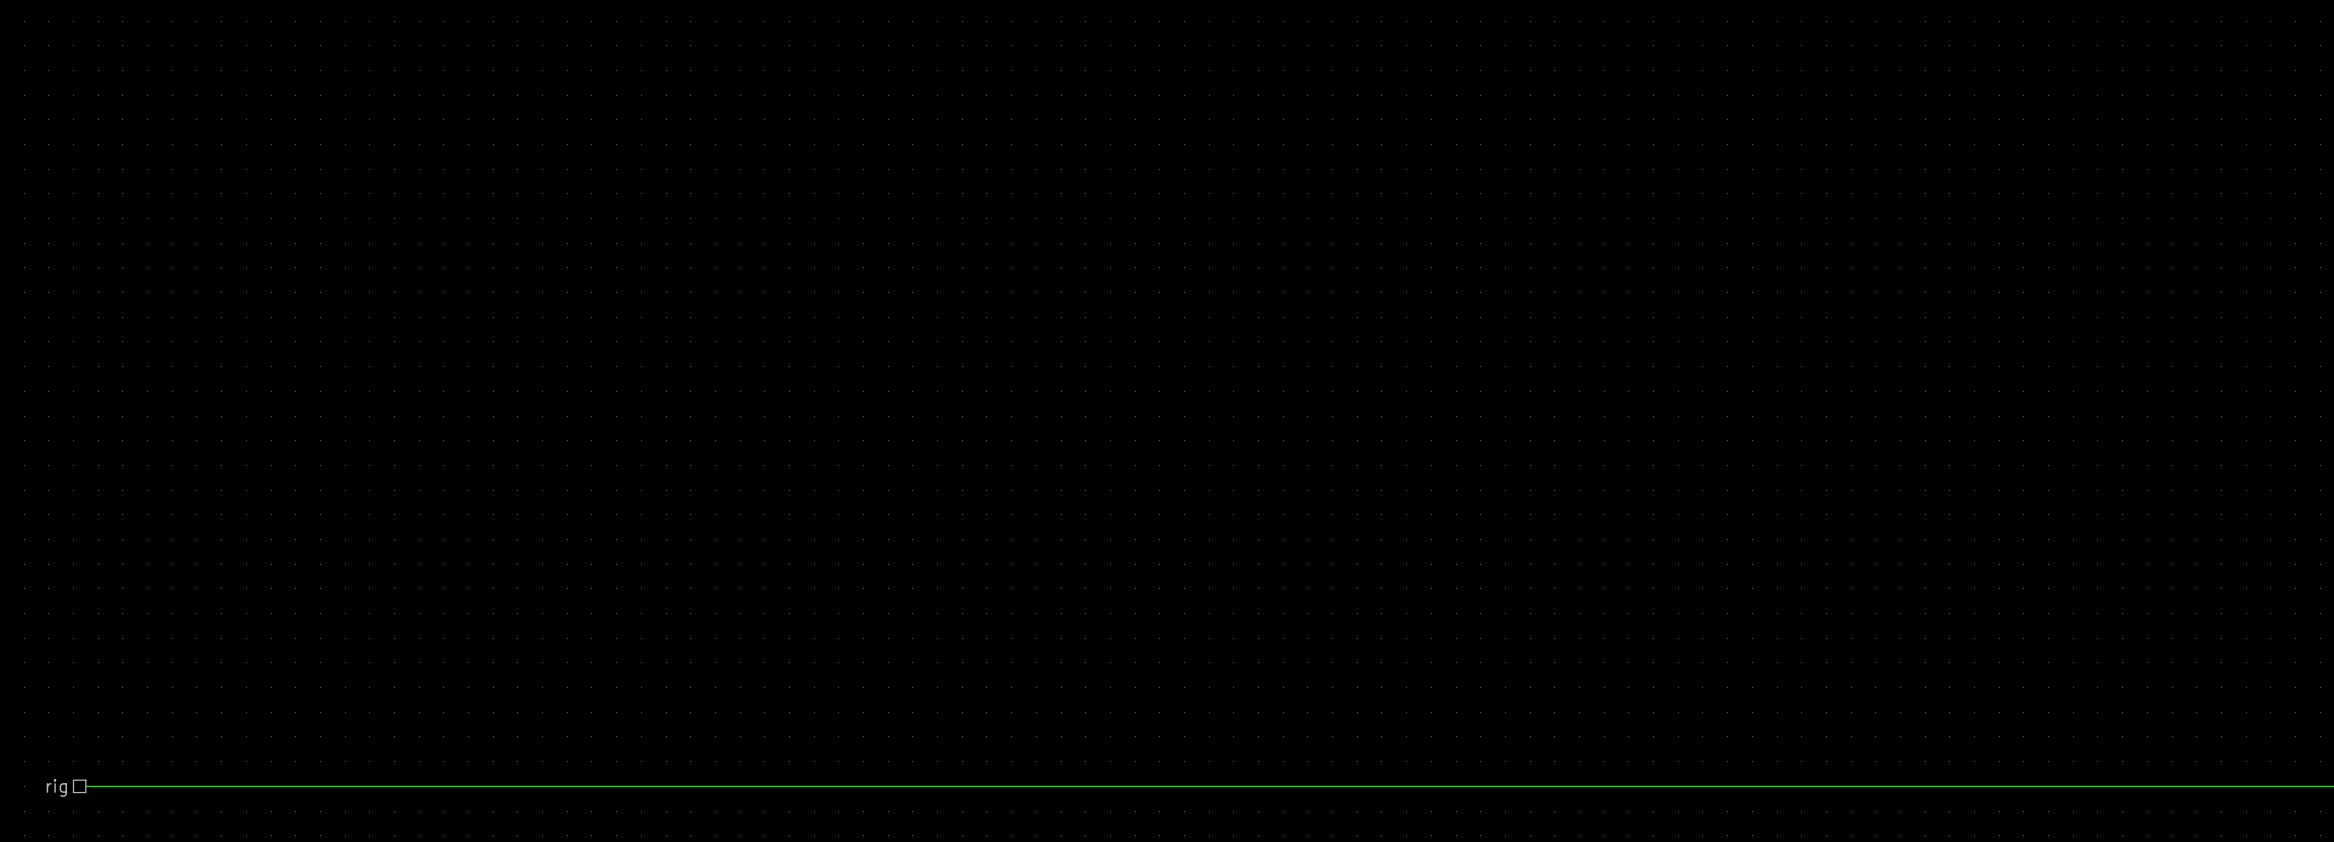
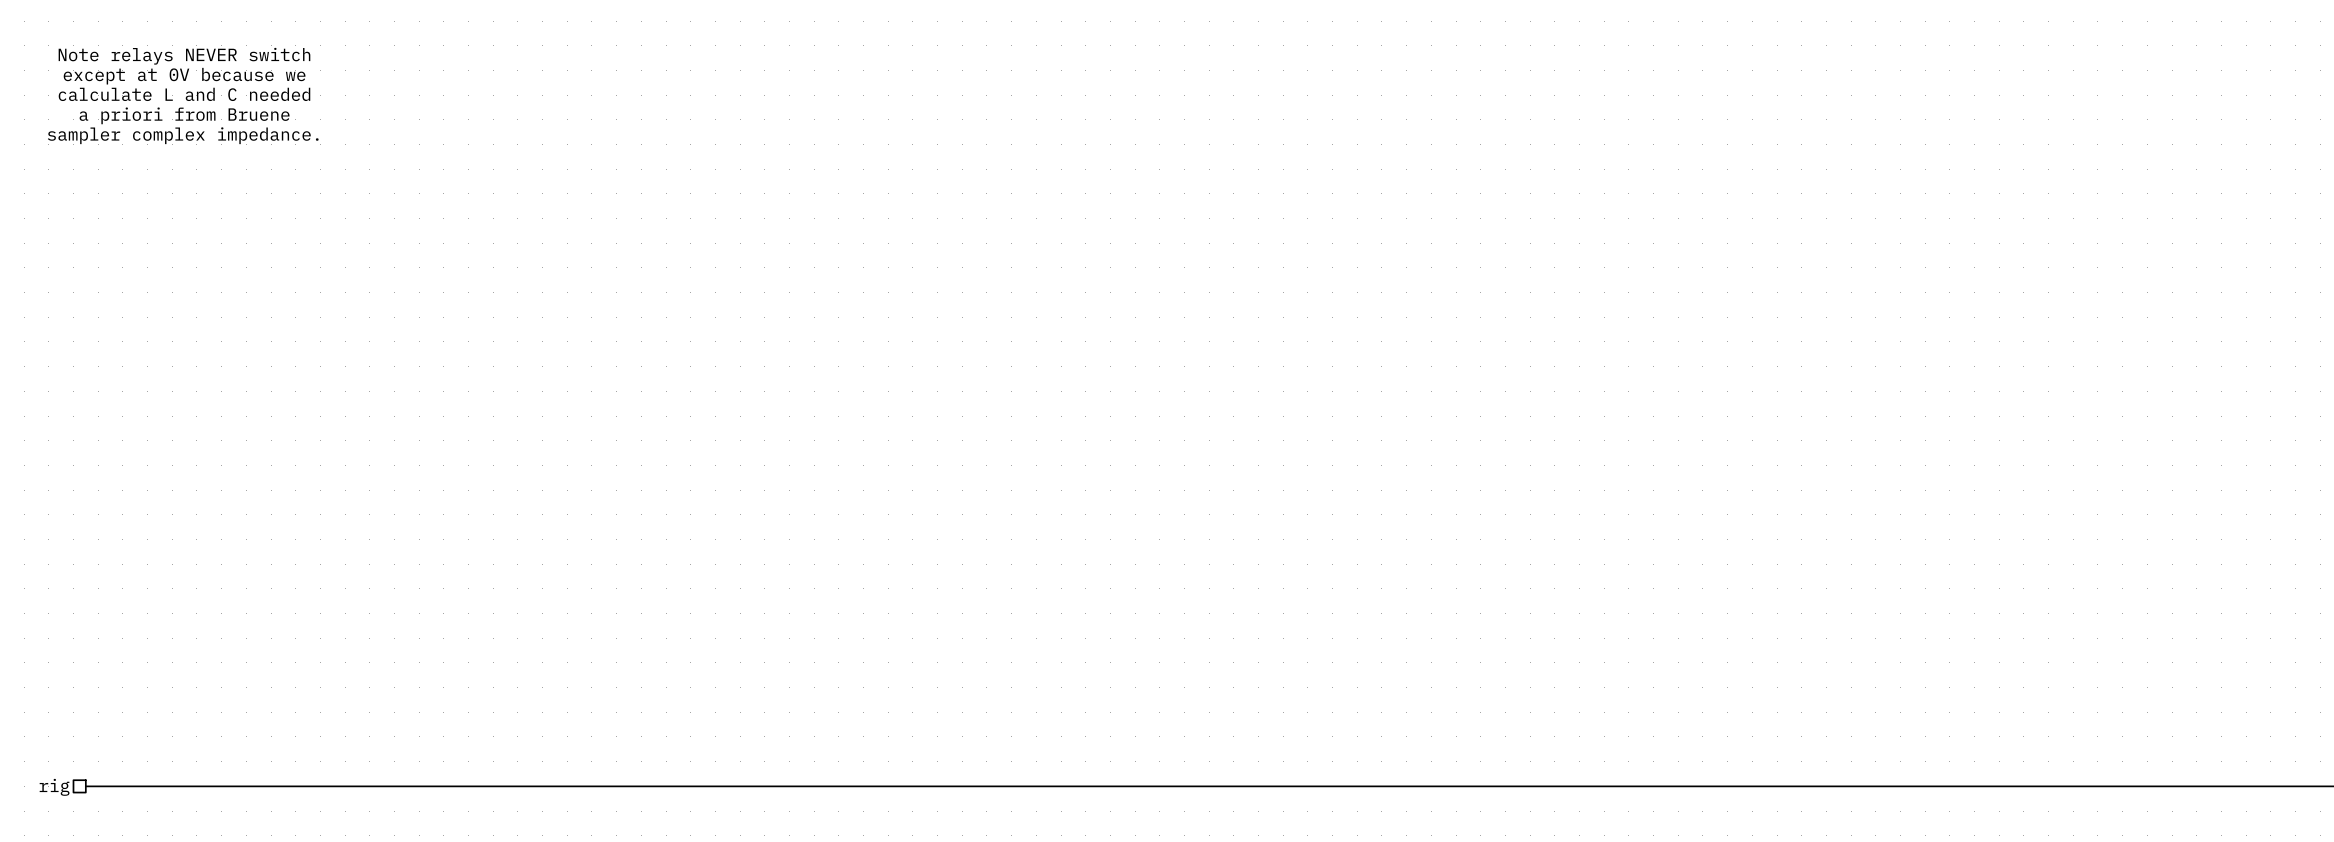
text: none -> Note relays NEVER switch (184, 56)
text: none -> except at 0V because we (184, 76)
text: none -> calculate L and C needed (184, 94)
text: none -> a priori from Bruene (184, 115)
text: none -> sampler complex impedance. (183, 135)

